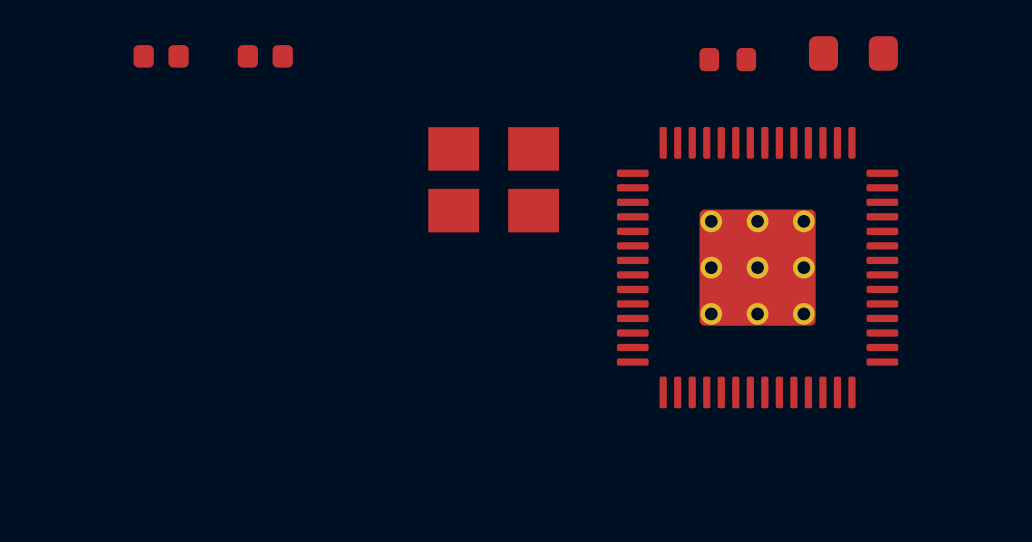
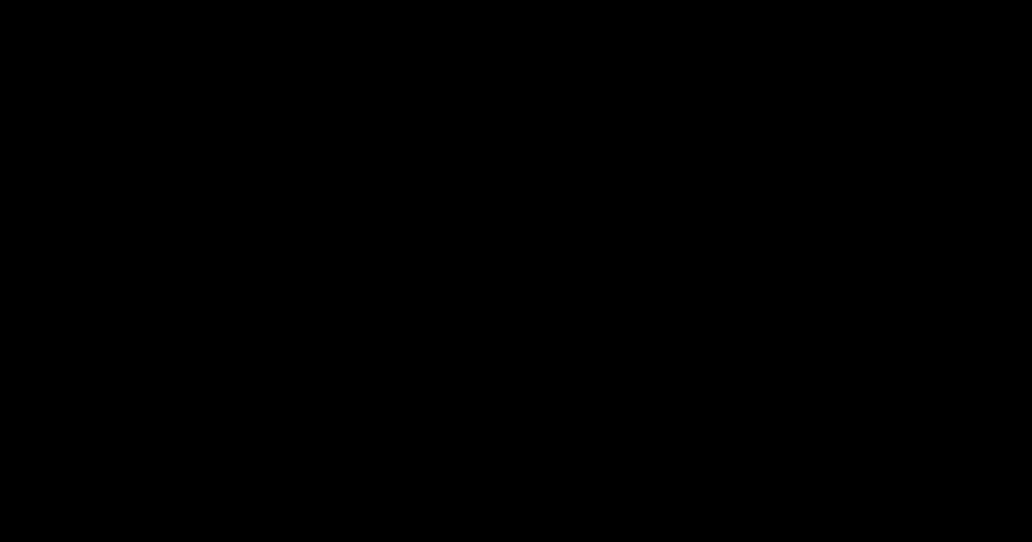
part: (853, 53) -> none
part: (161, 56) -> none
part: (265, 56) -> none
part: (727, 59) -> none
part: (493, 179) -> none
part: (757, 267) -> none

